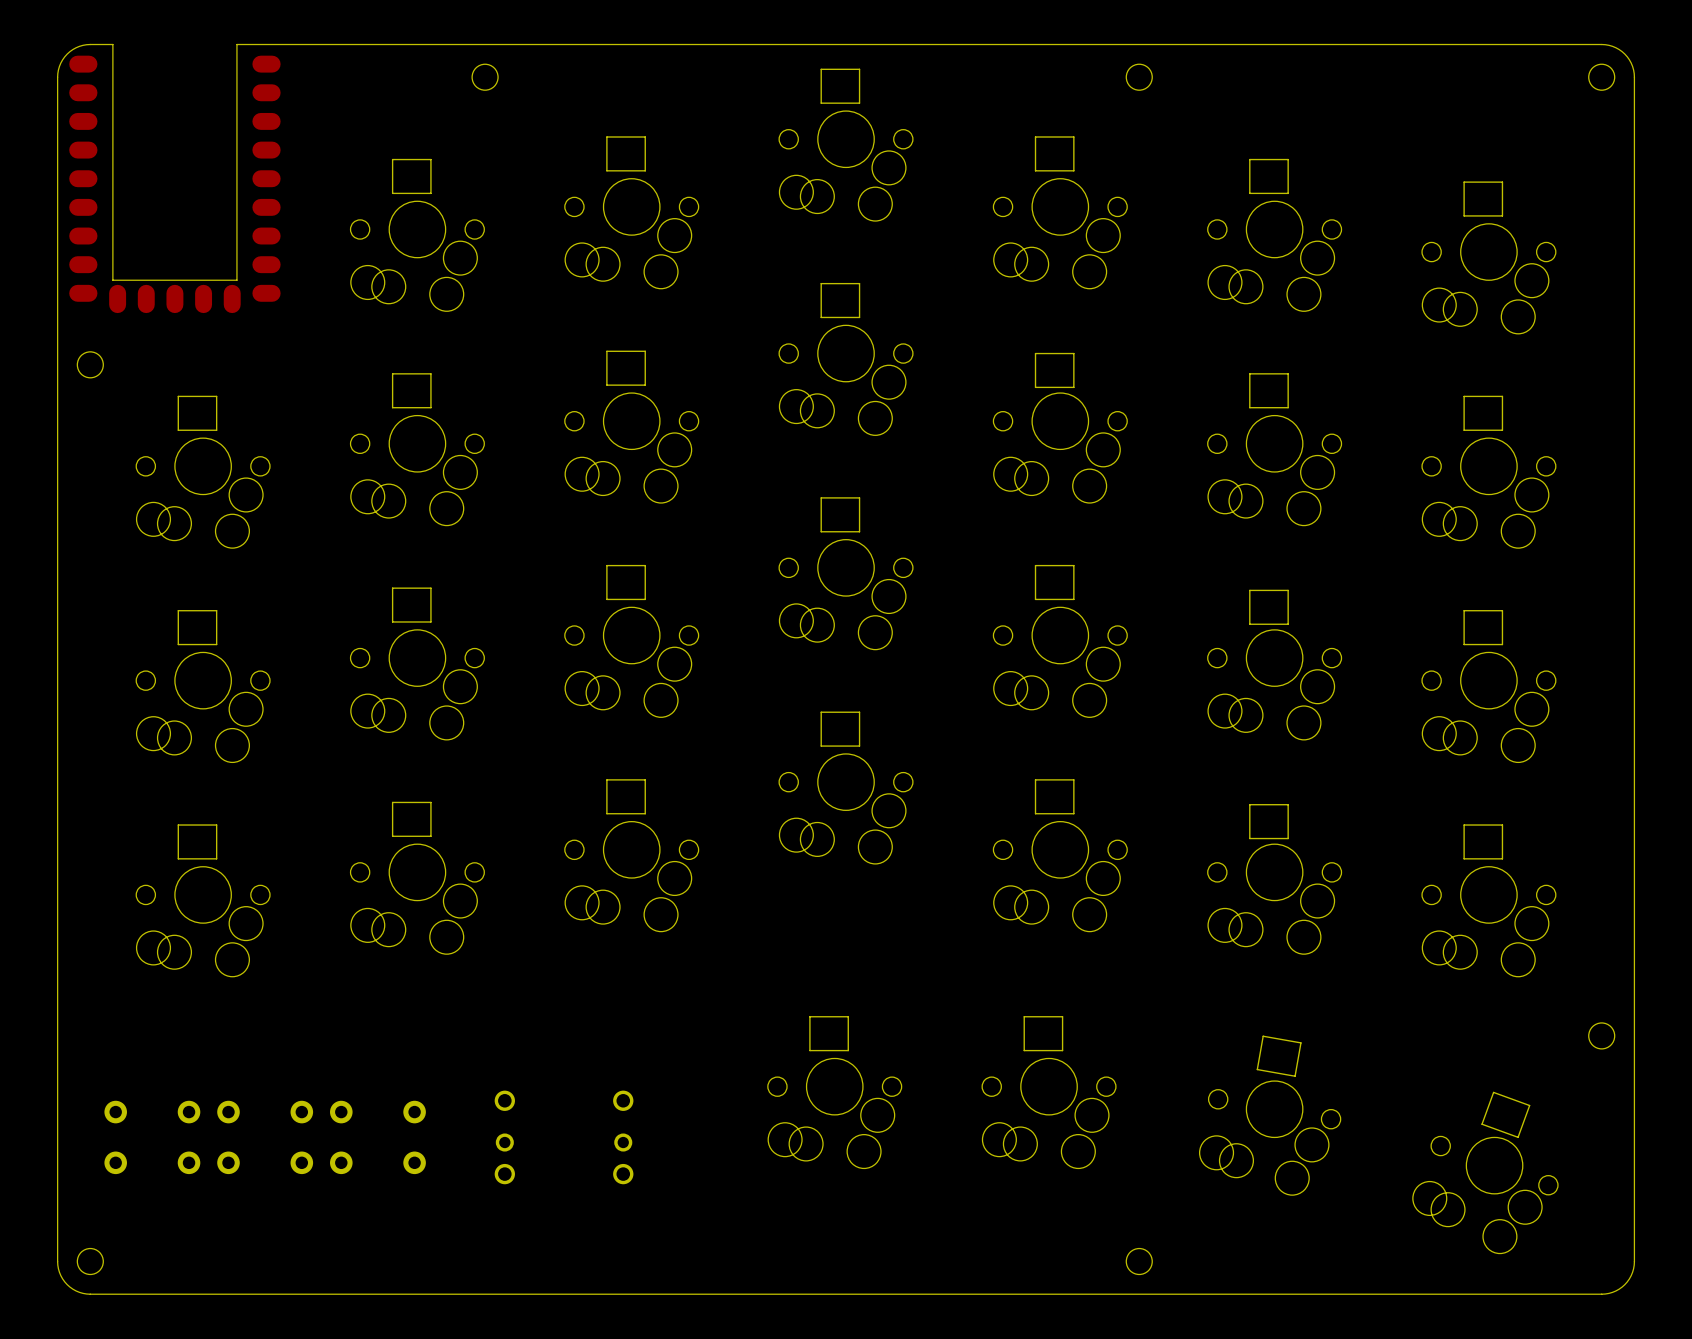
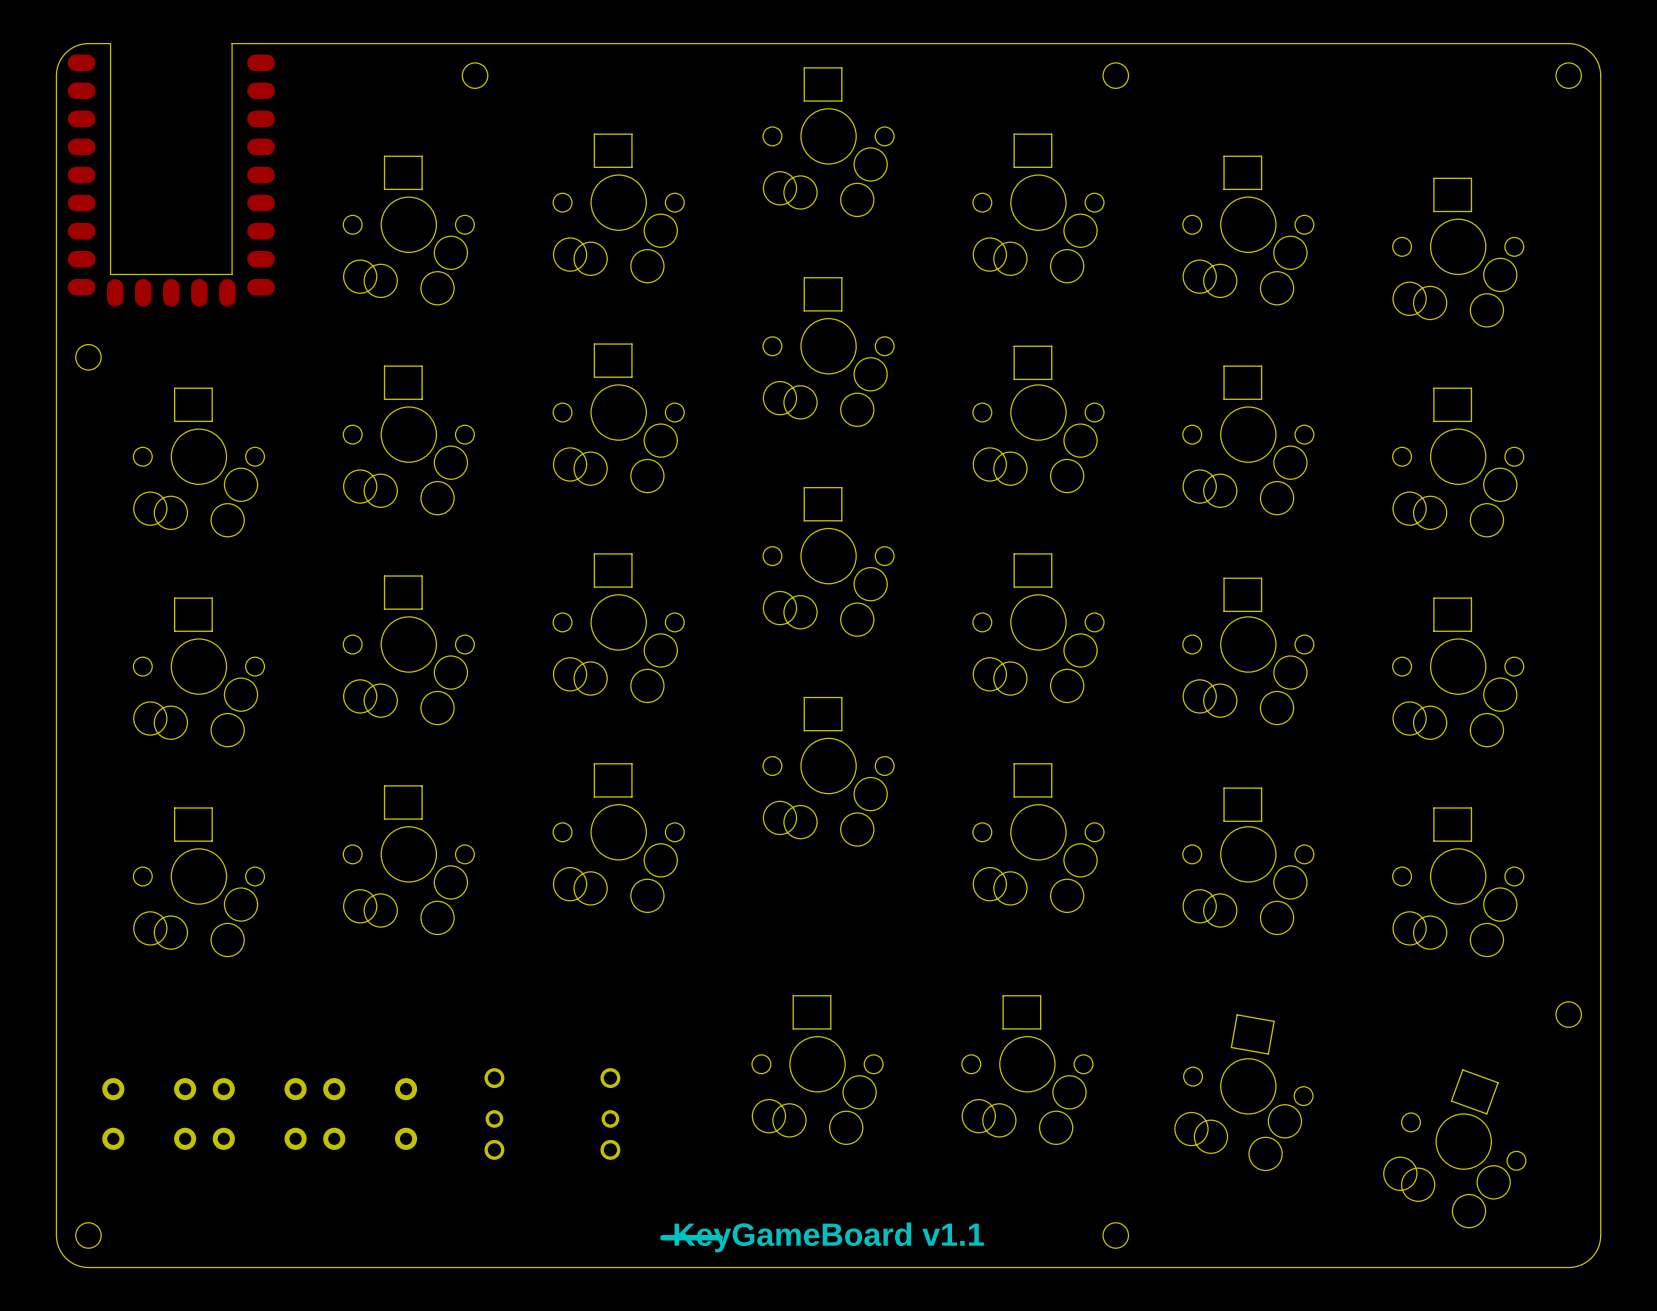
line: none -> (662, 1237) (720, 1237)
text: none -> KeyGameBoard v1.1 (829, 1237)

